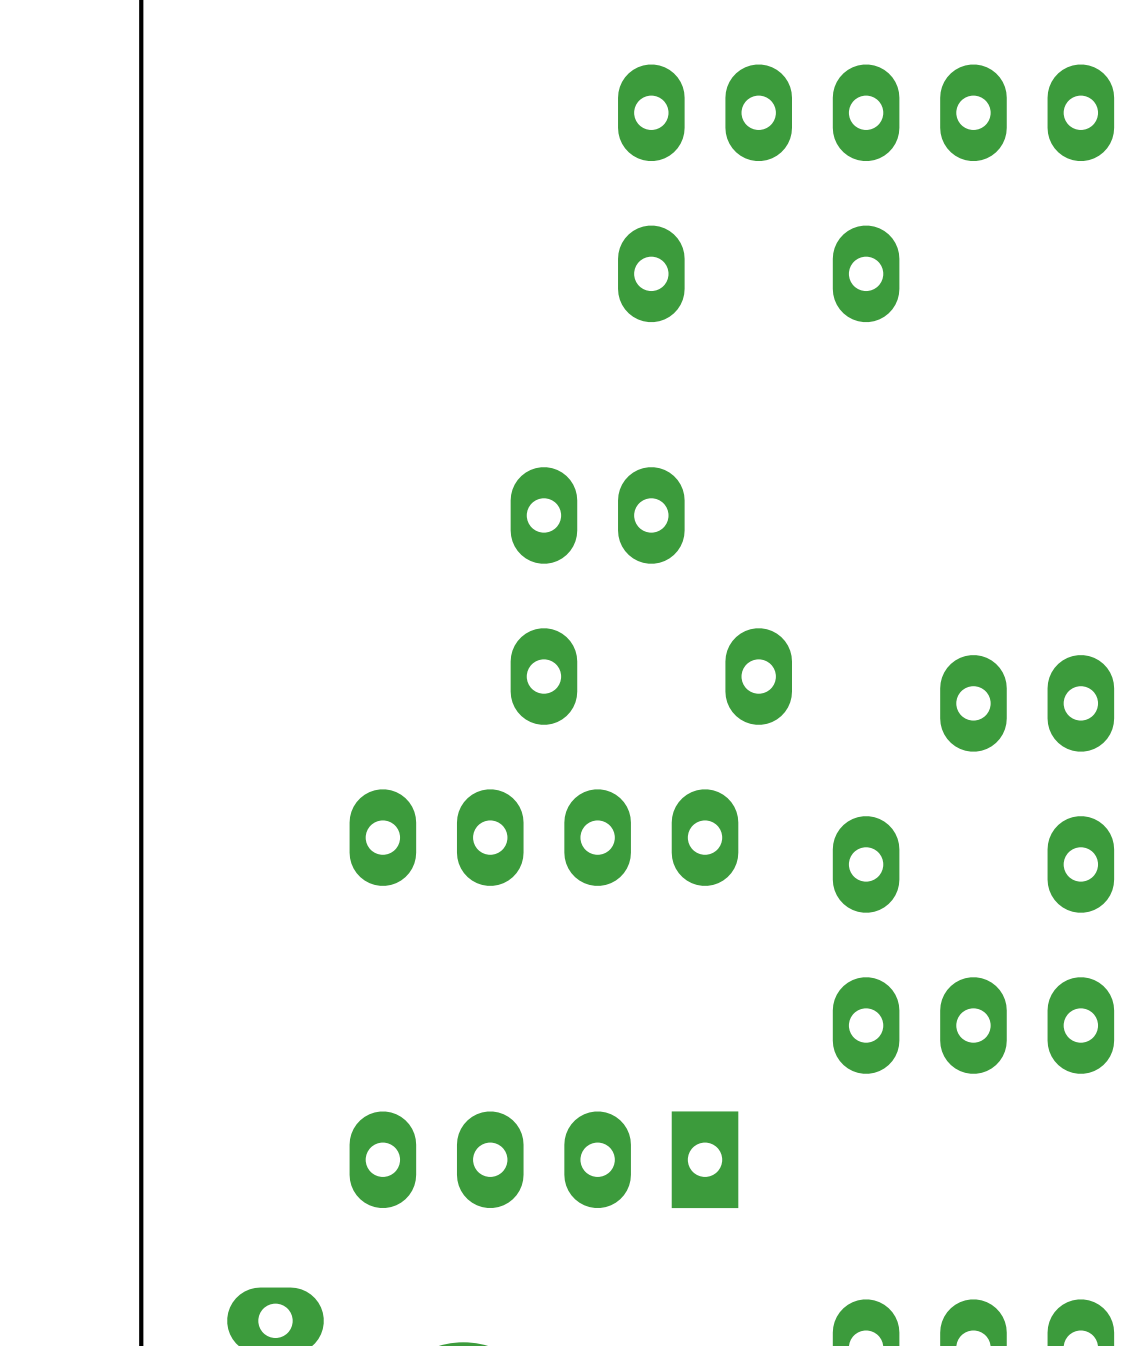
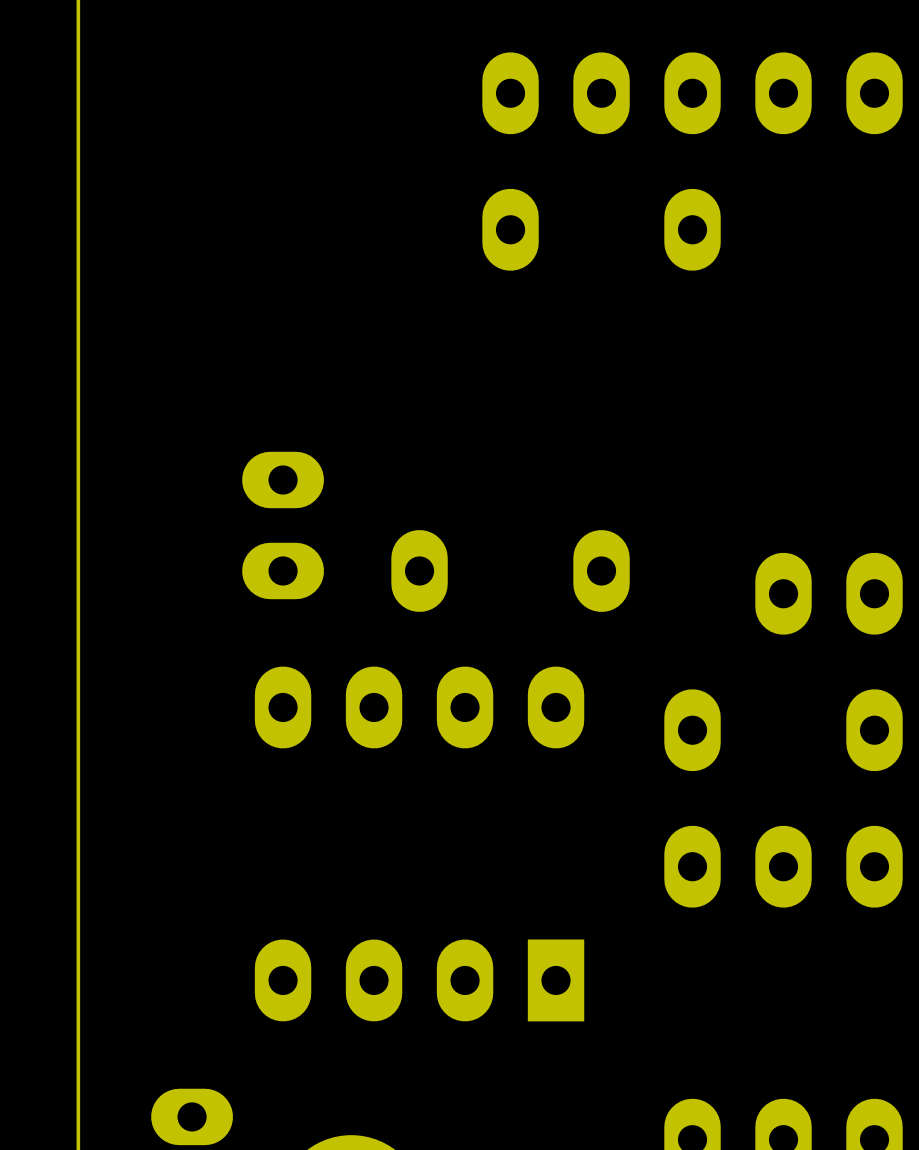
part rotation: 0° (597, 515) -> 90° clockwise (283, 525)
part position: (597, 515) -> (283, 525)

